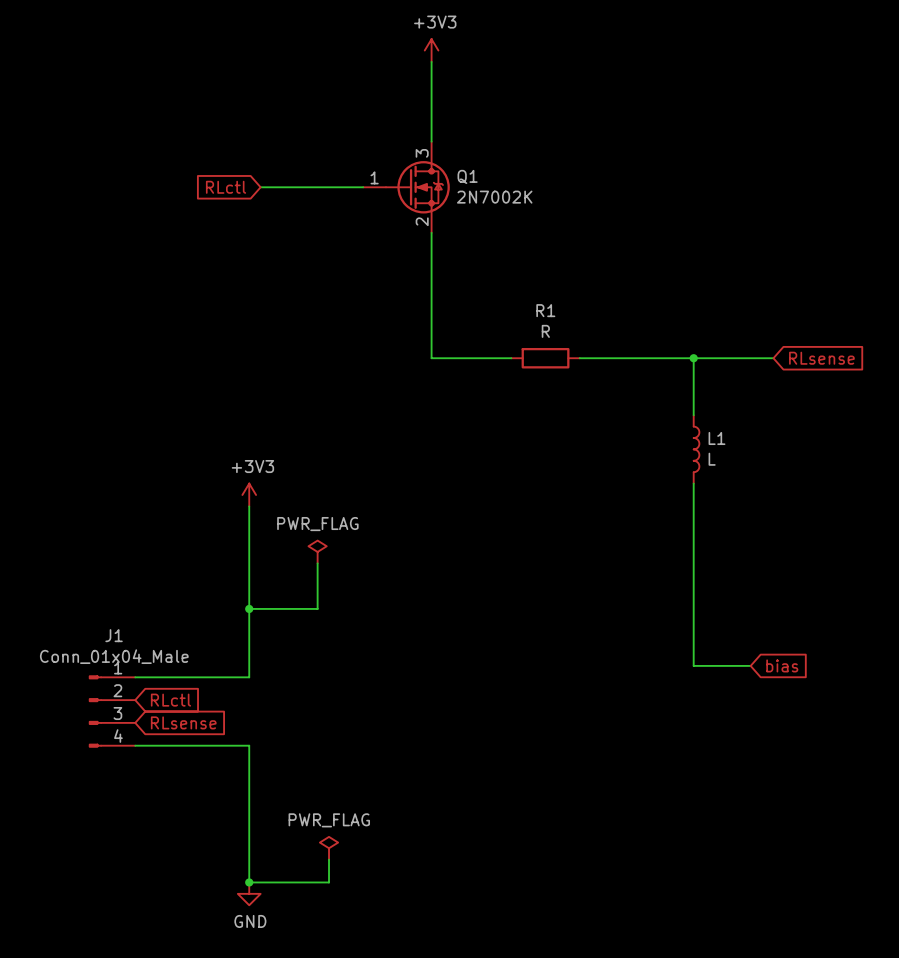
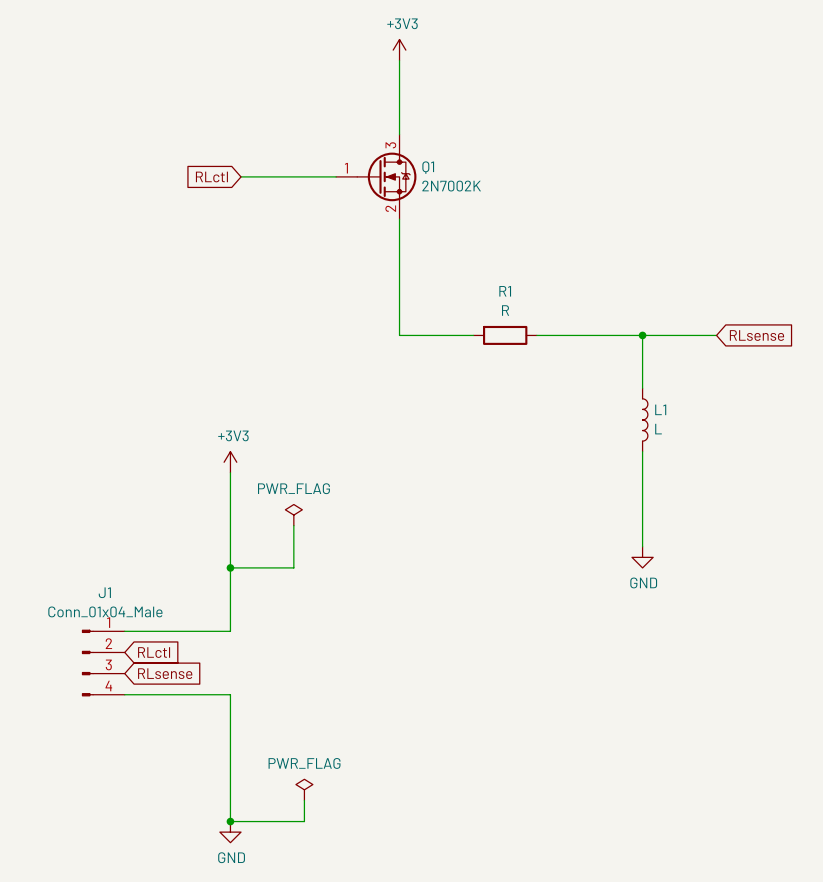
wire: (693, 586) (693, 665) (750, 665) -> none
power symbol: none -> GND (642, 557)
global label: bias (782, 665) -> none

